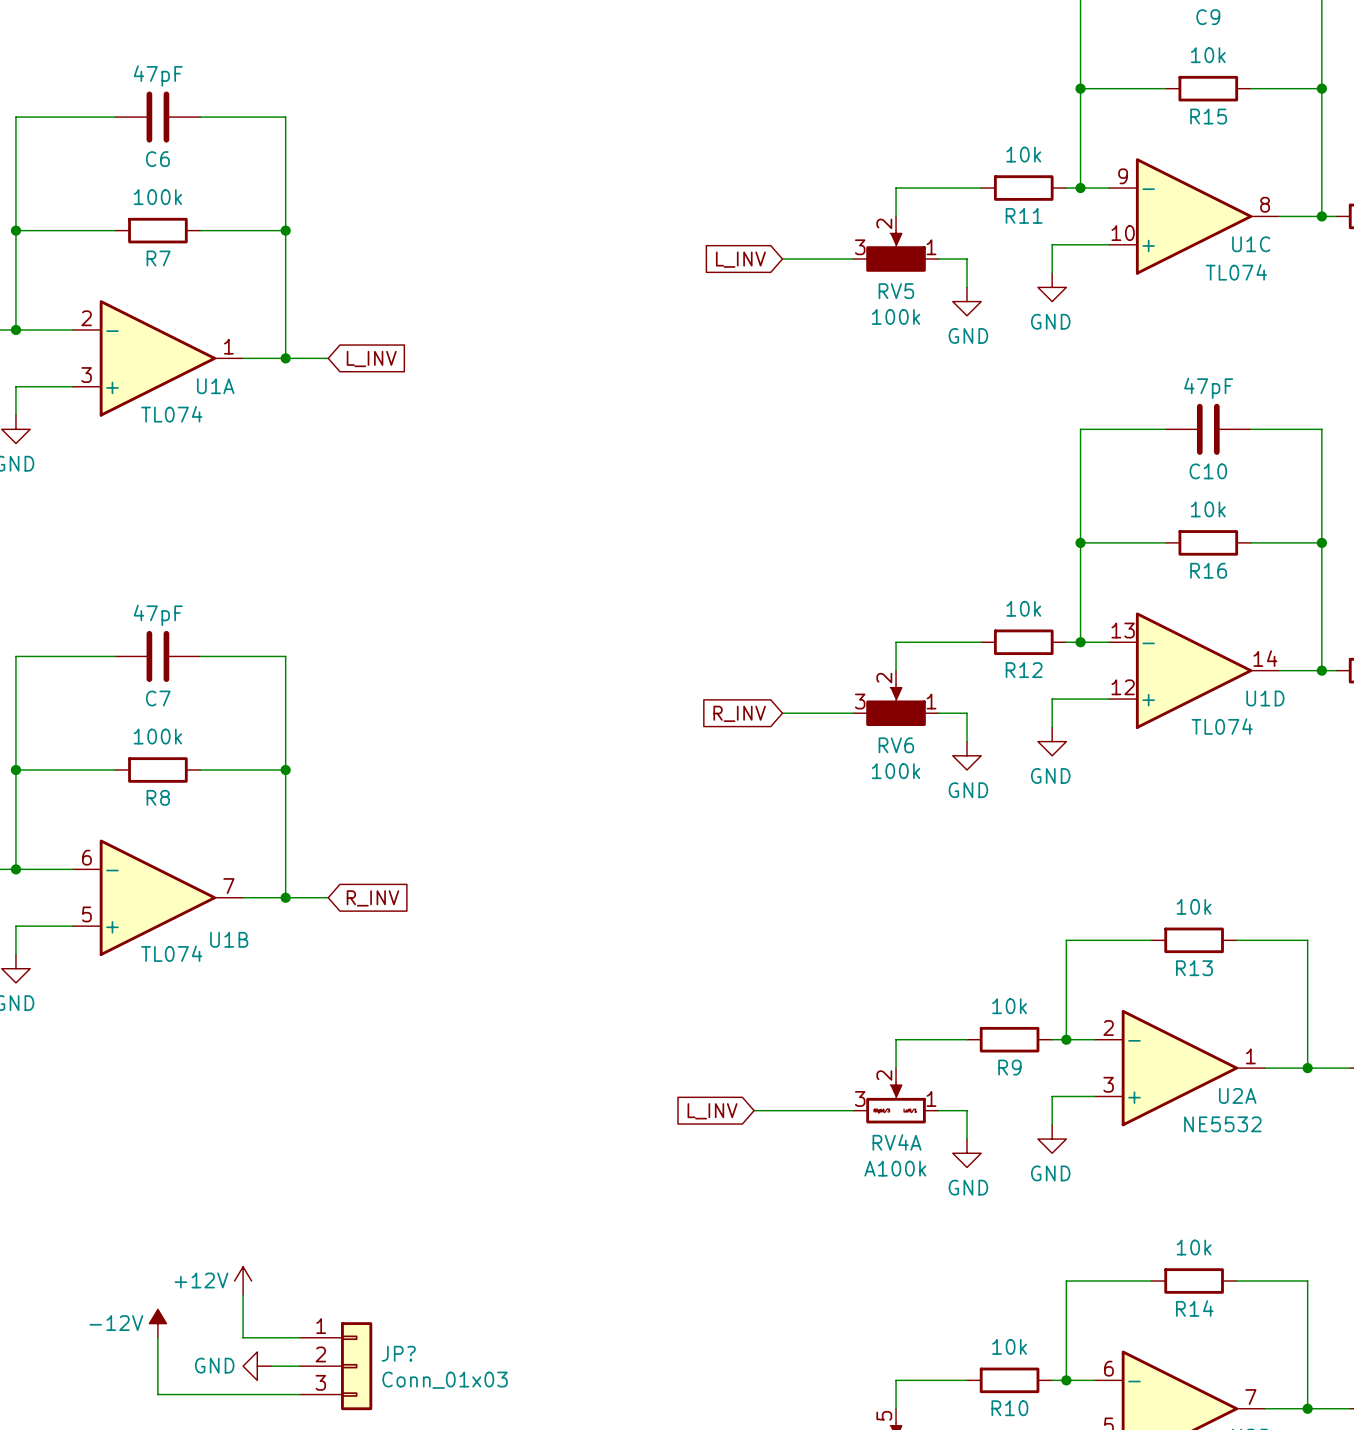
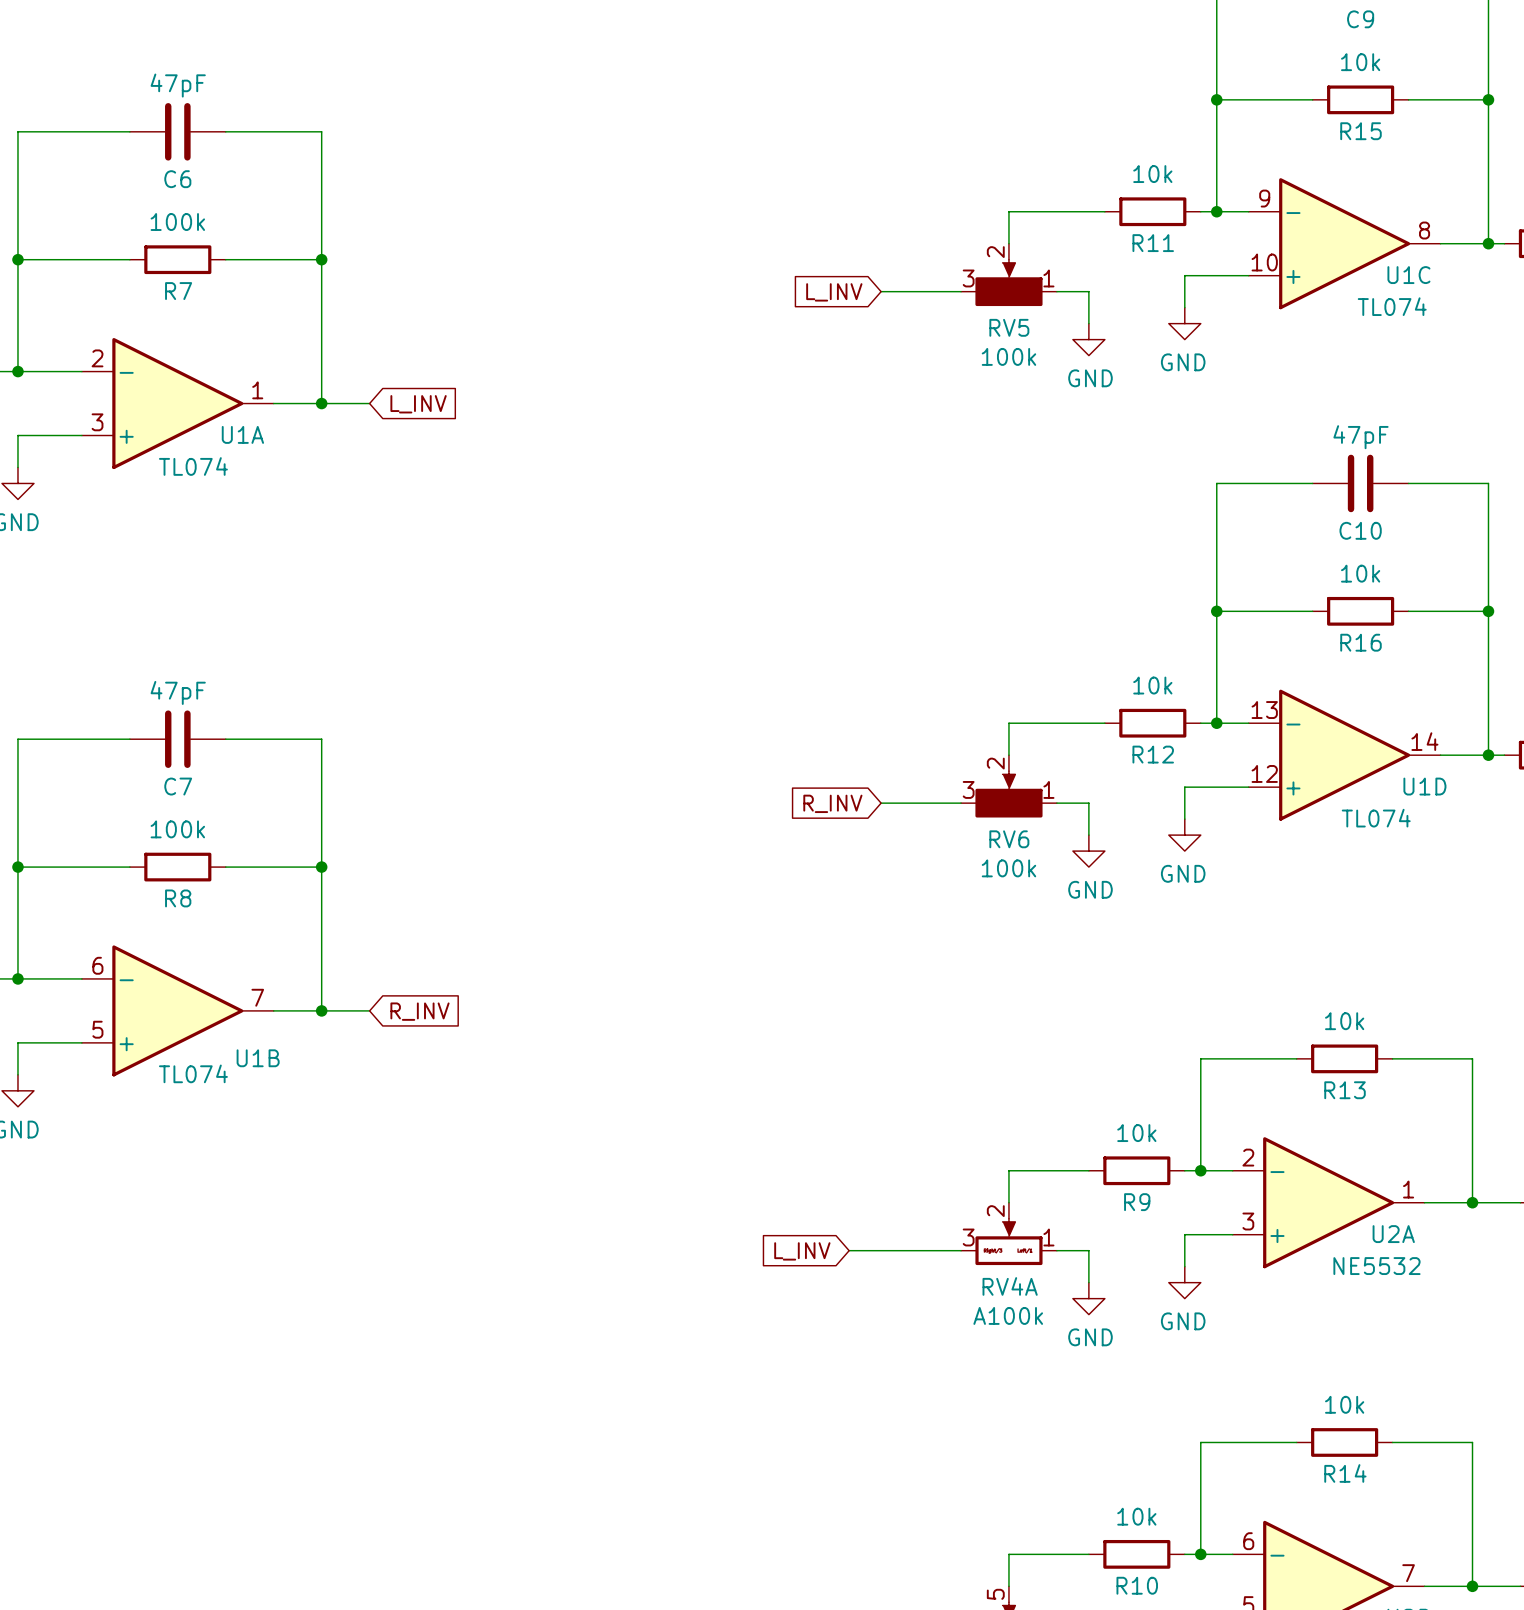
power symbol: +12V (243, 1281) -> none
wire: (243, 1295) (243, 1337) (299, 1337) -> none
power symbol: -12V (157, 1323) -> none
wire: (157, 1337) (157, 1394) (299, 1394) -> none
power symbol: GND (257, 1366) -> none
wire: (271, 1366) (299, 1366) -> none
JP?: Conn_01x03 (336, 1366) -> none

